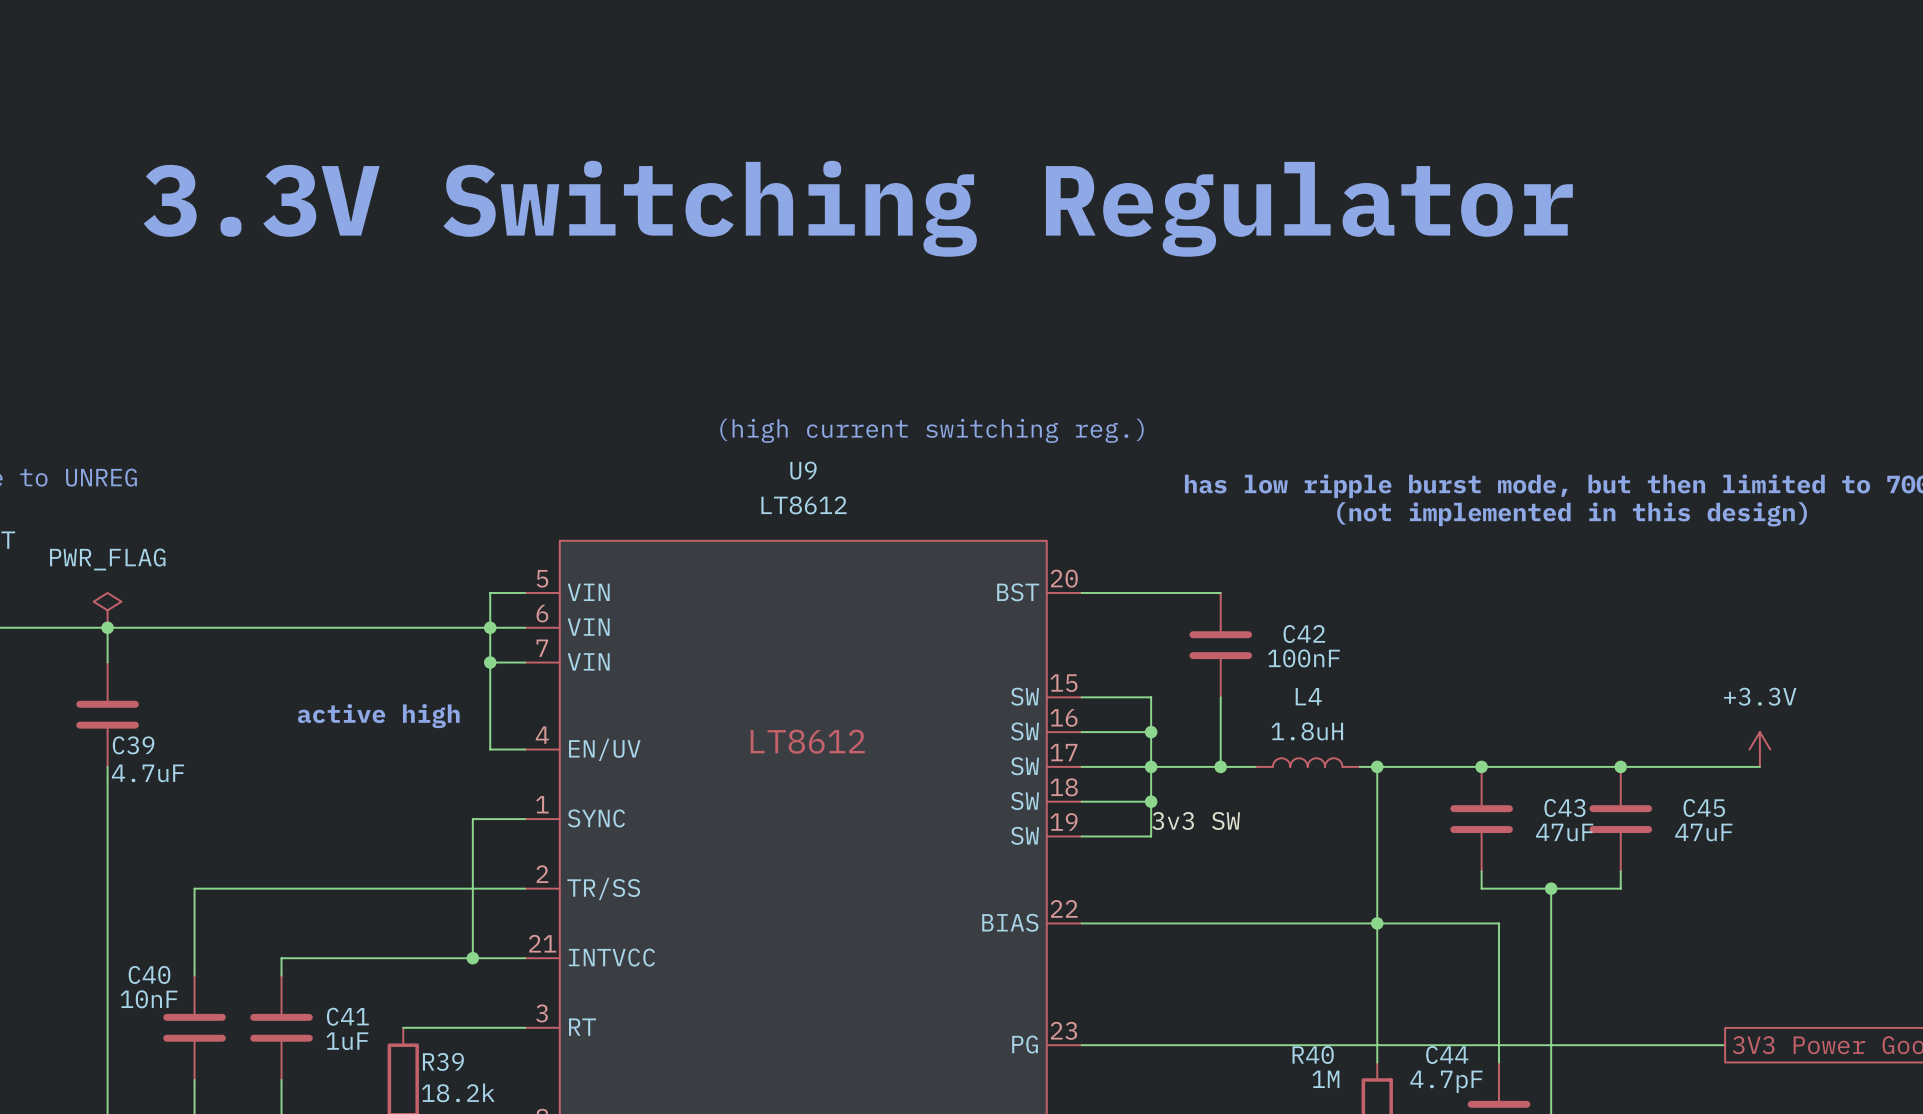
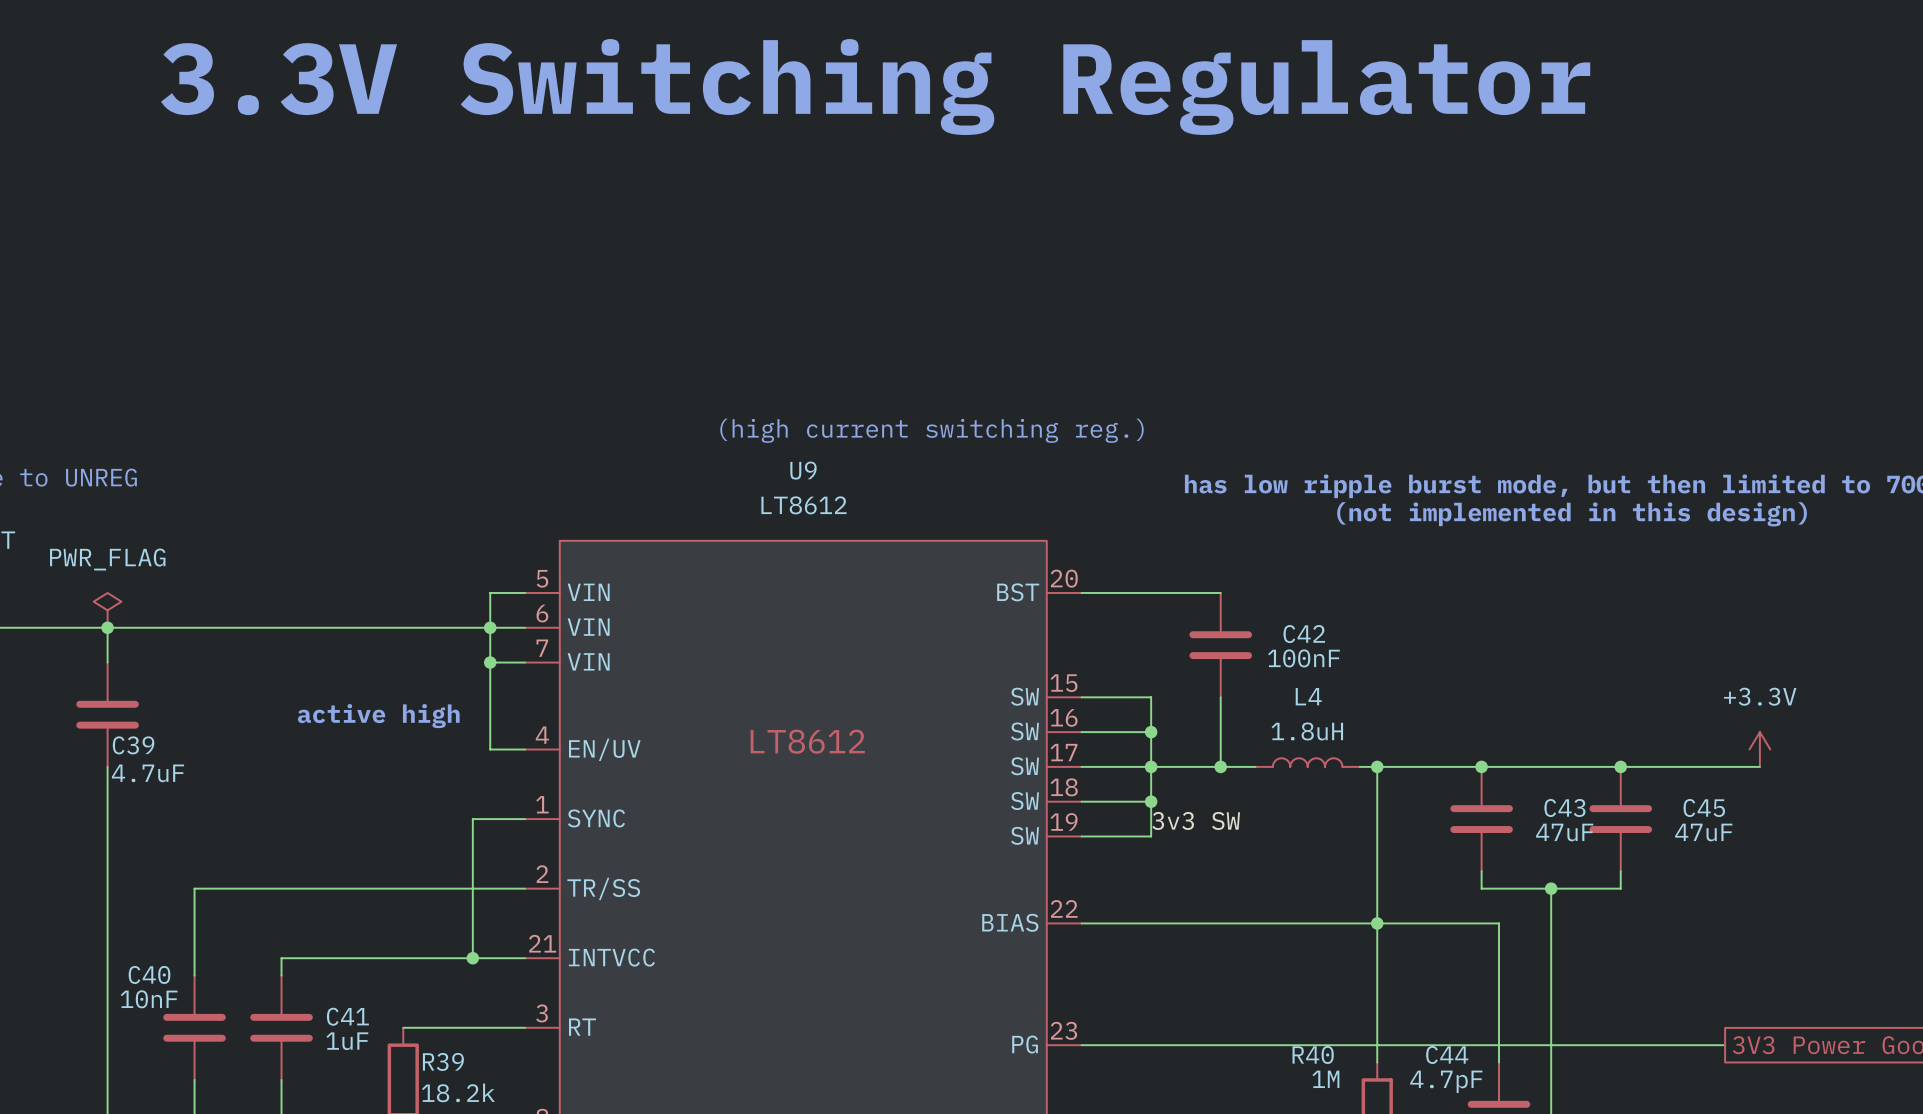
text position: 3.3V Switching Regulator (858, 208) -> 3.3V Switching Regulator (875, 87)

